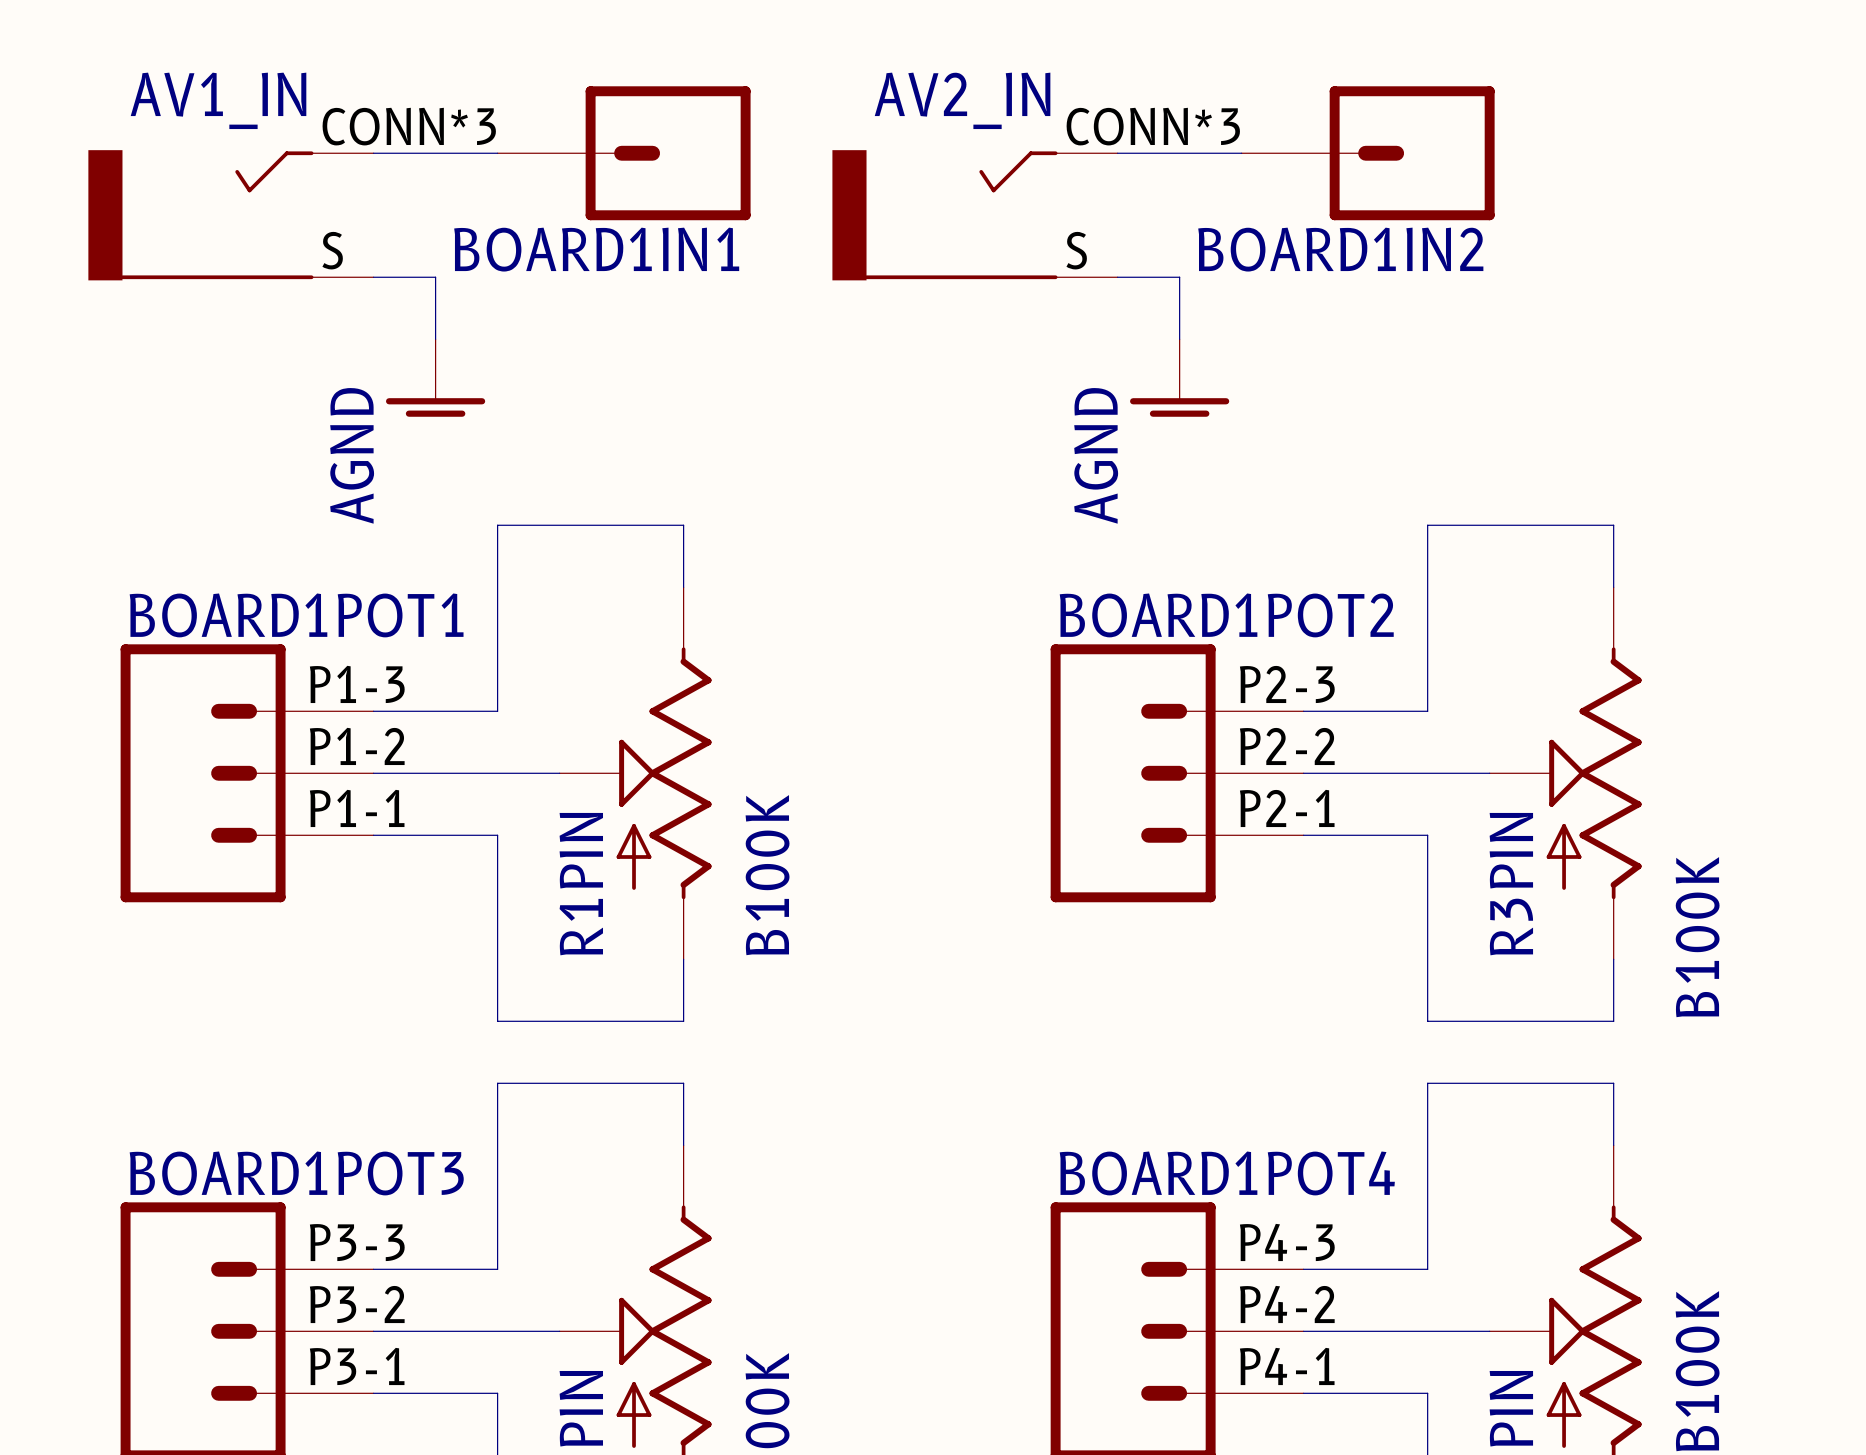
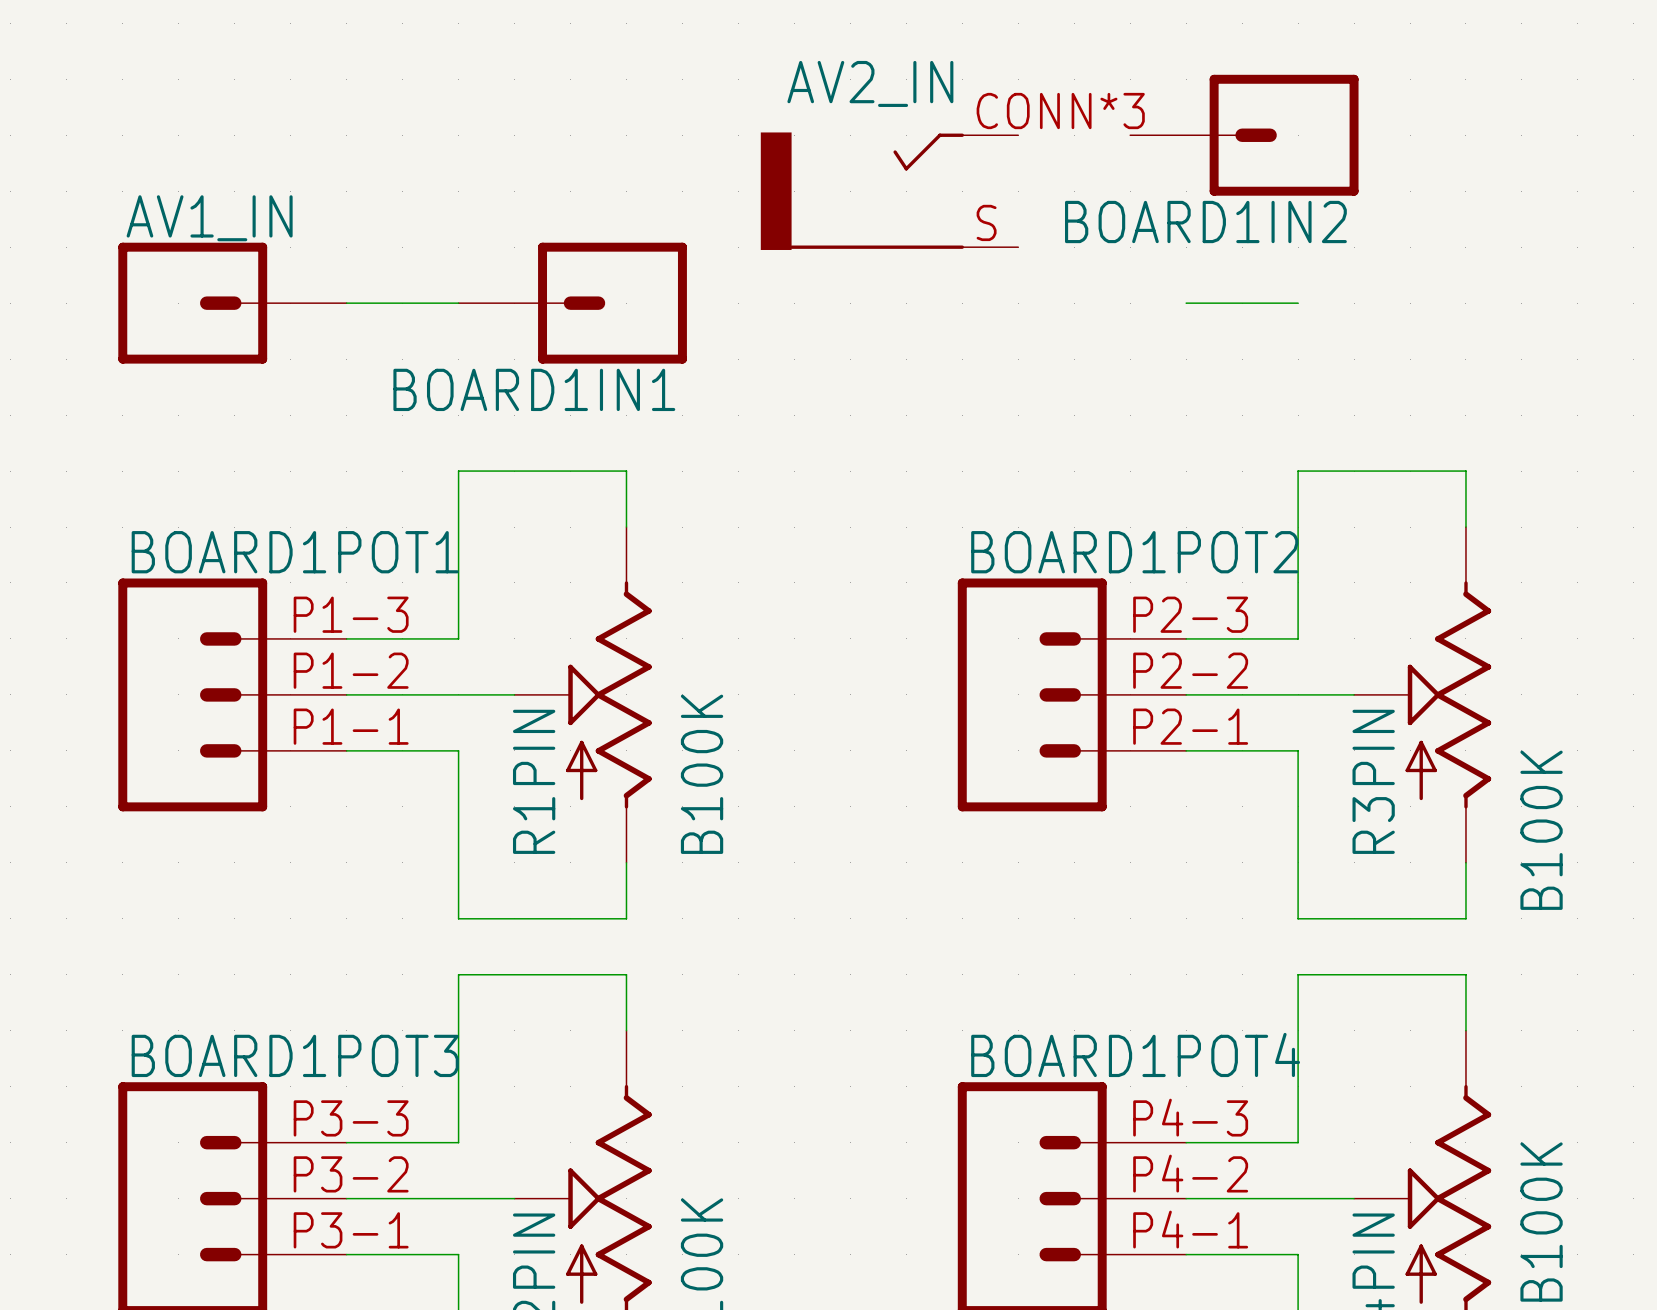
AV1_IN name position: AV1_IN (218, 100) -> AV1_IN (209, 218)
AV1_IN symbol: [88, 150, 374, 281] -> [118, 242, 347, 364]
wire: (373, 153) (497, 153) -> (346, 303) (458, 303)
BOARD1IN1 position: (624, 153) -> (572, 303)
wire: (1117, 153) (1241, 153) -> (1186, 303) (1298, 303)
wire: (373, 277) (435, 277) (435, 339) -> none
wire: (1117, 277) (1179, 277) (1179, 339) -> none
power symbol: AGND (435, 378) -> none
power symbol: AGND (1179, 378) -> none

